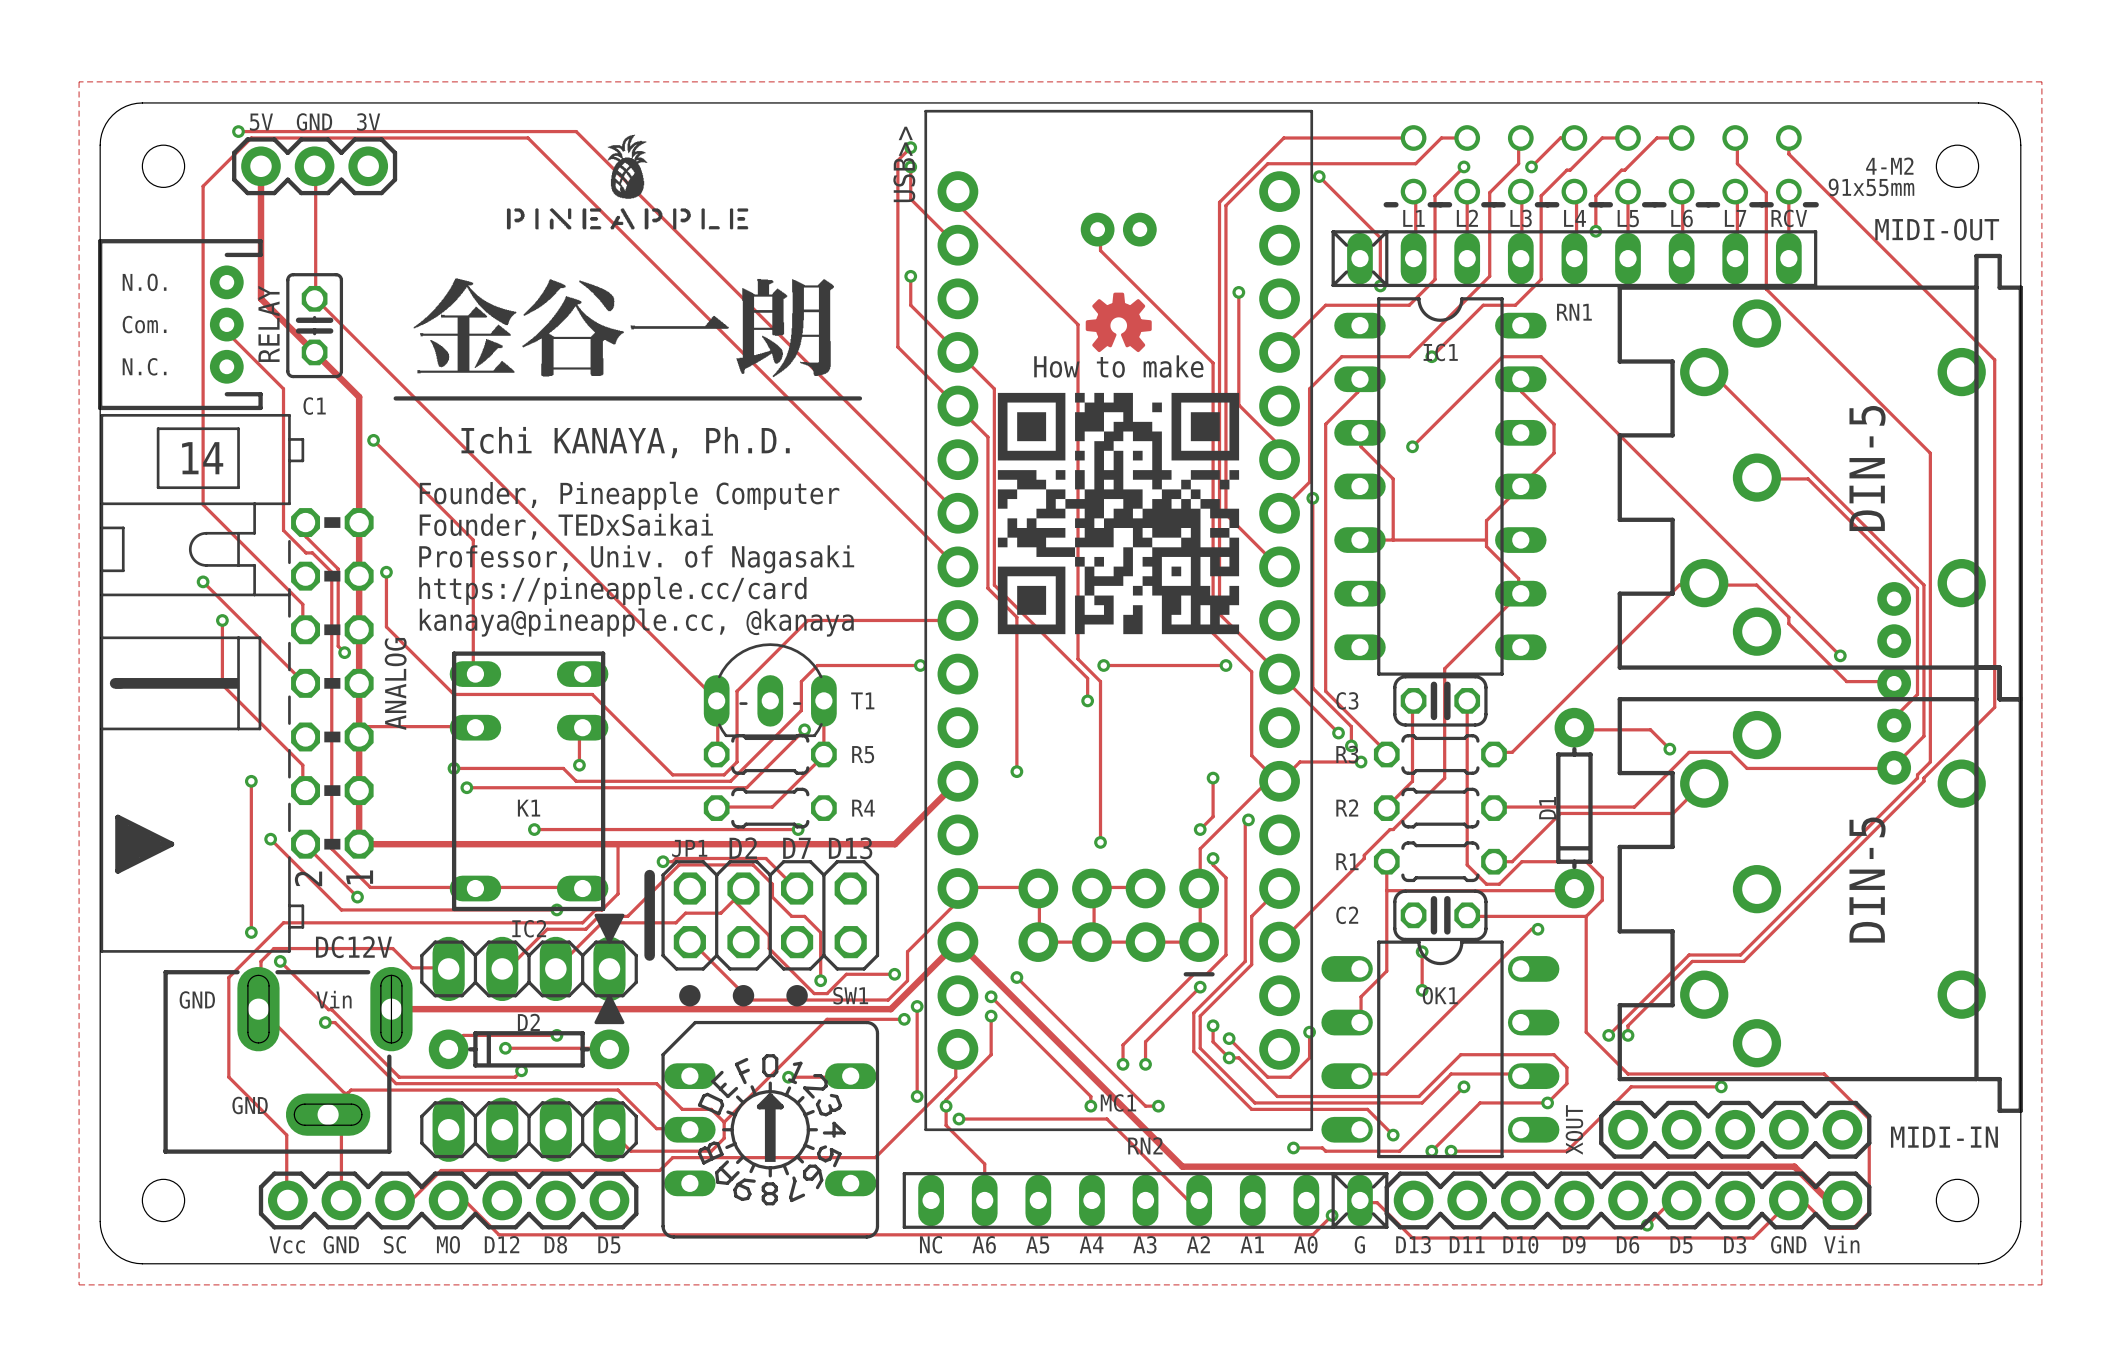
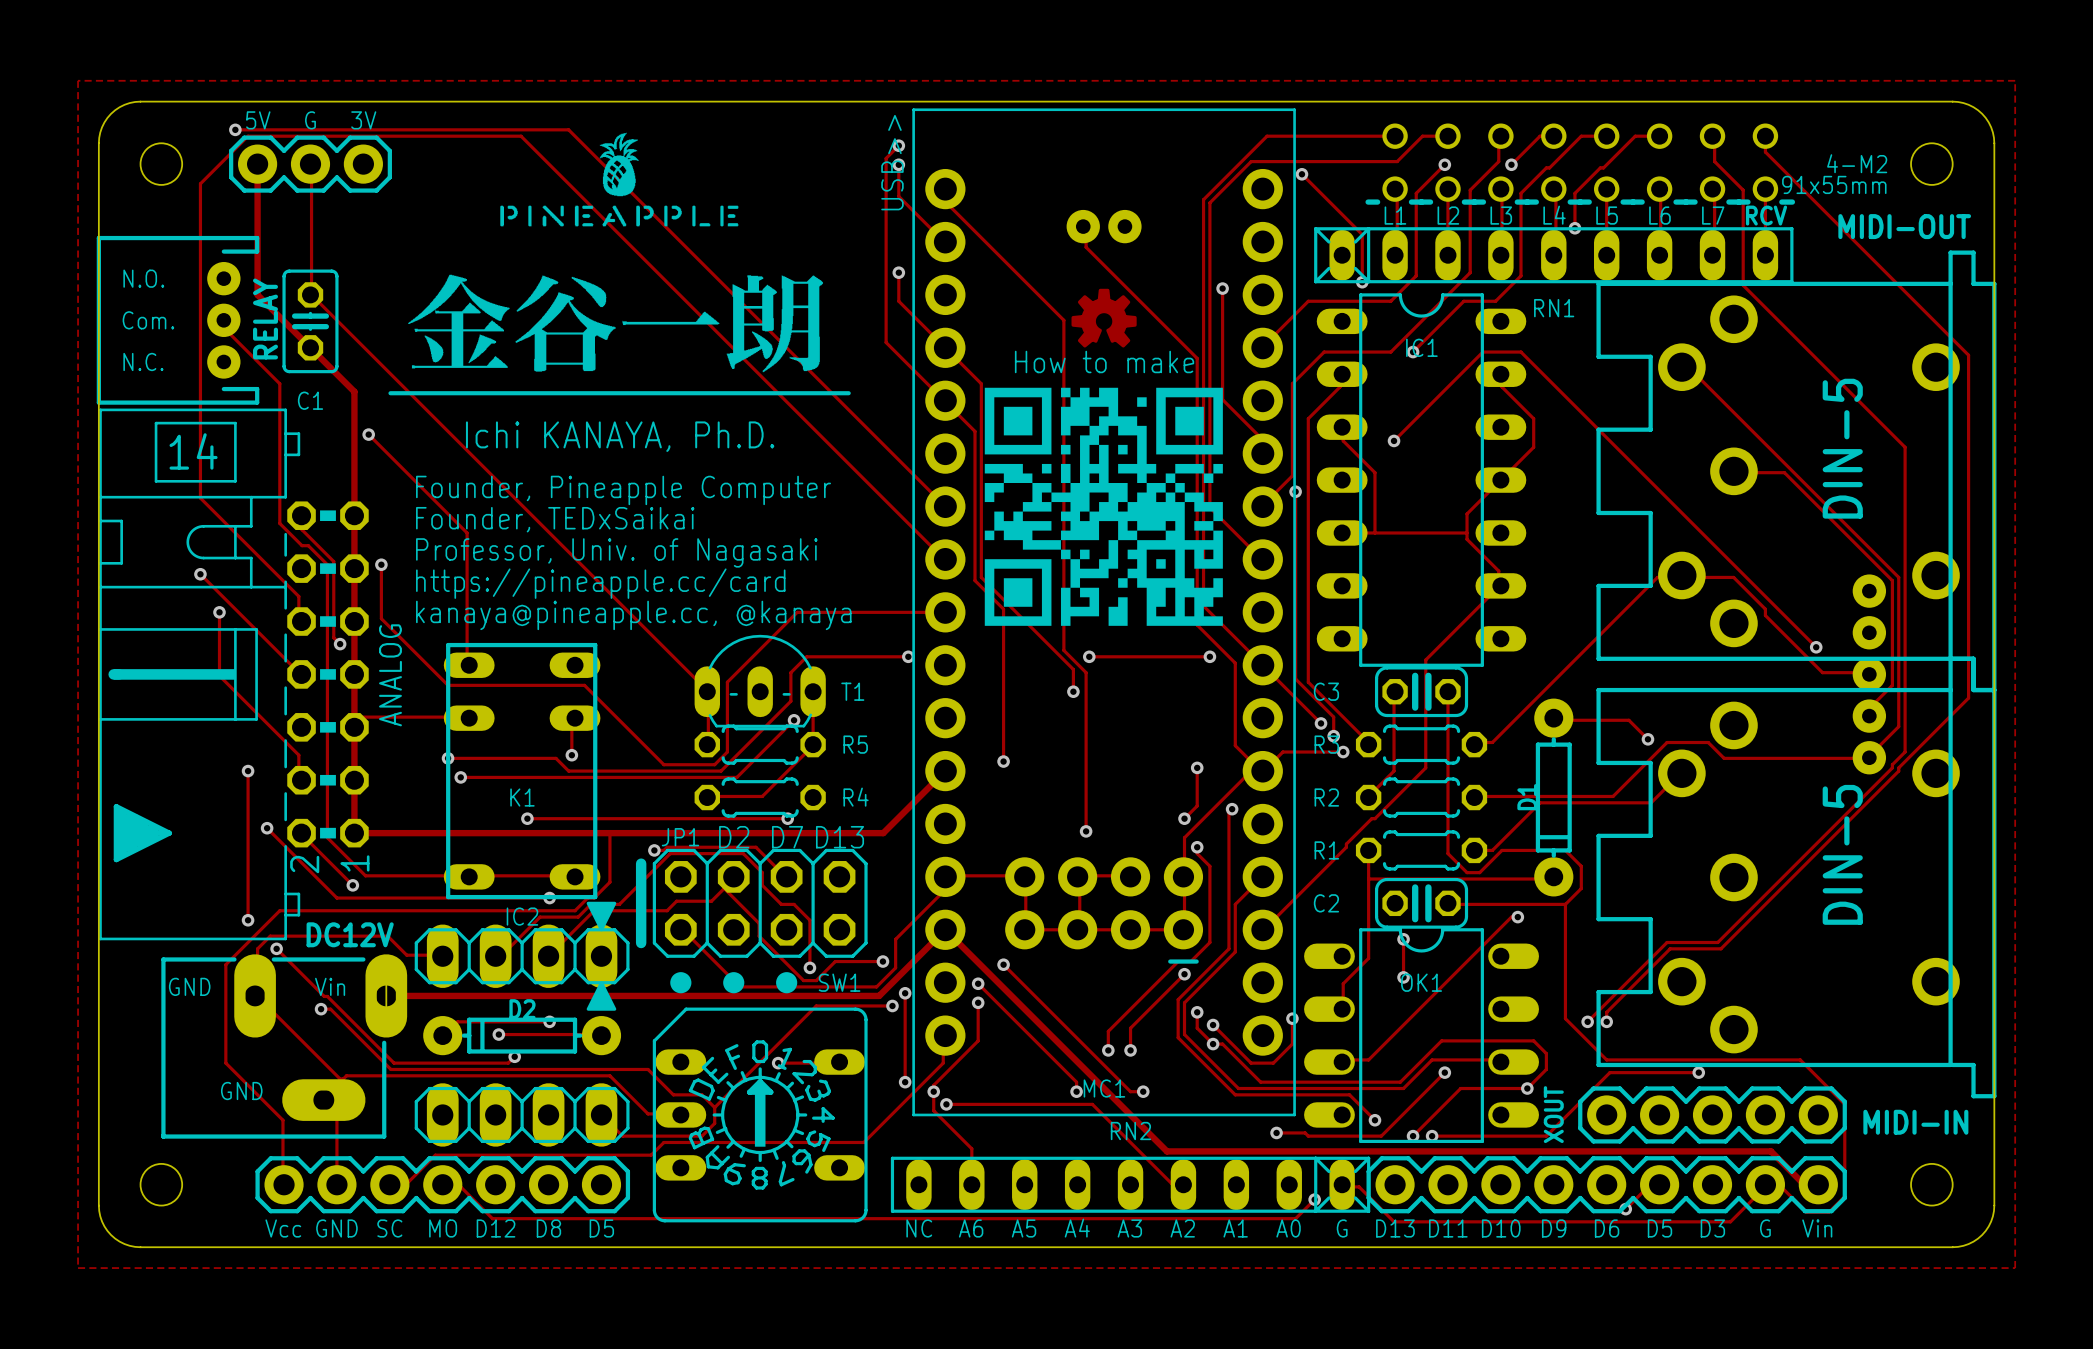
text: GND (314, 121) -> G (310, 120)
text: GND (1788, 1244) -> G (1765, 1228)

